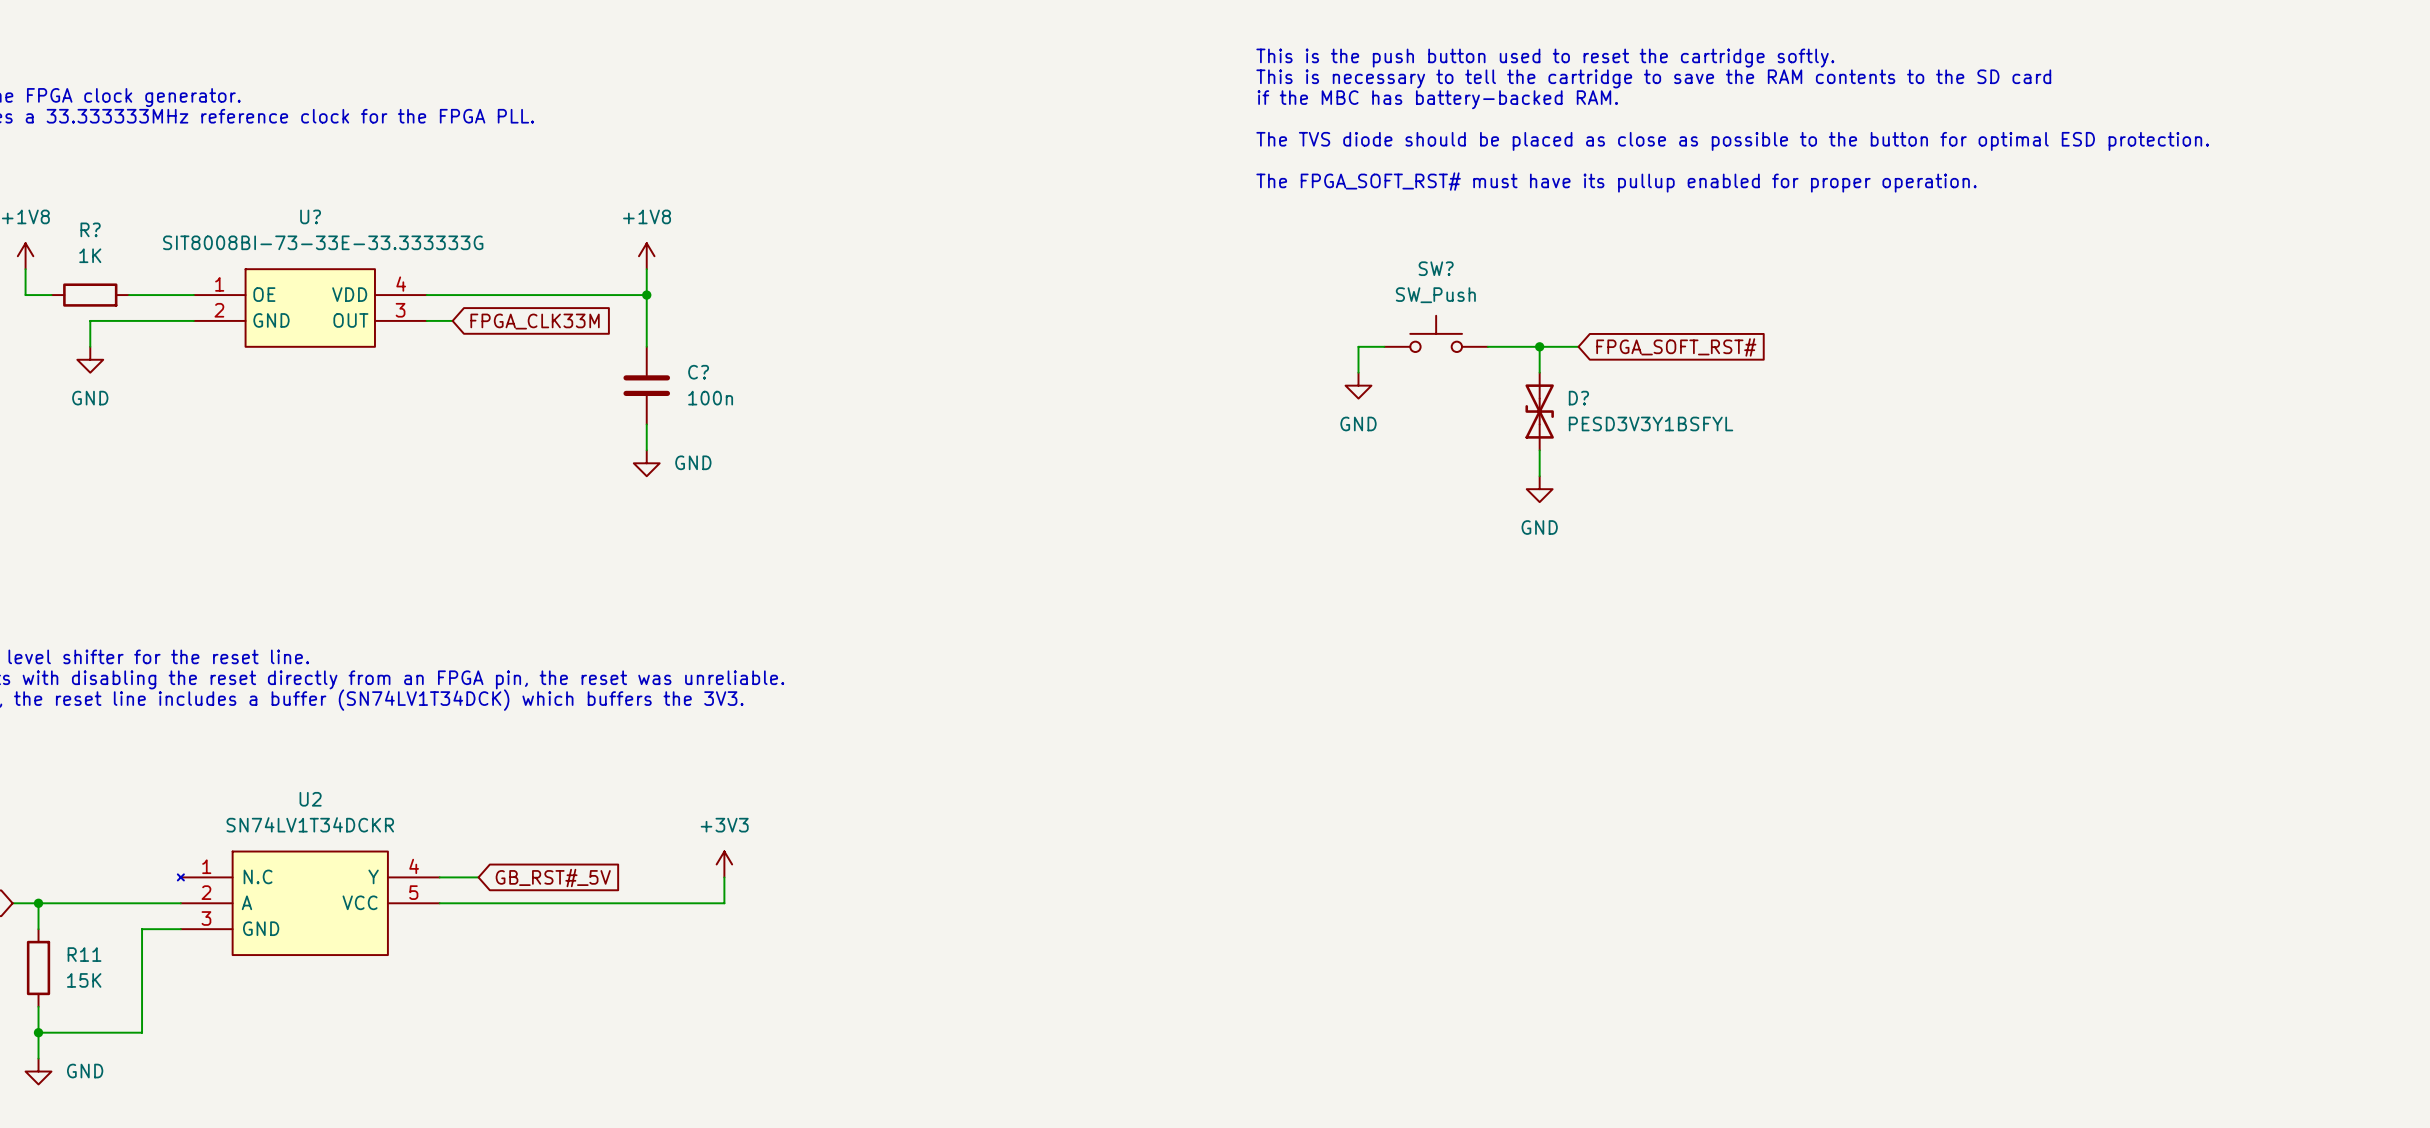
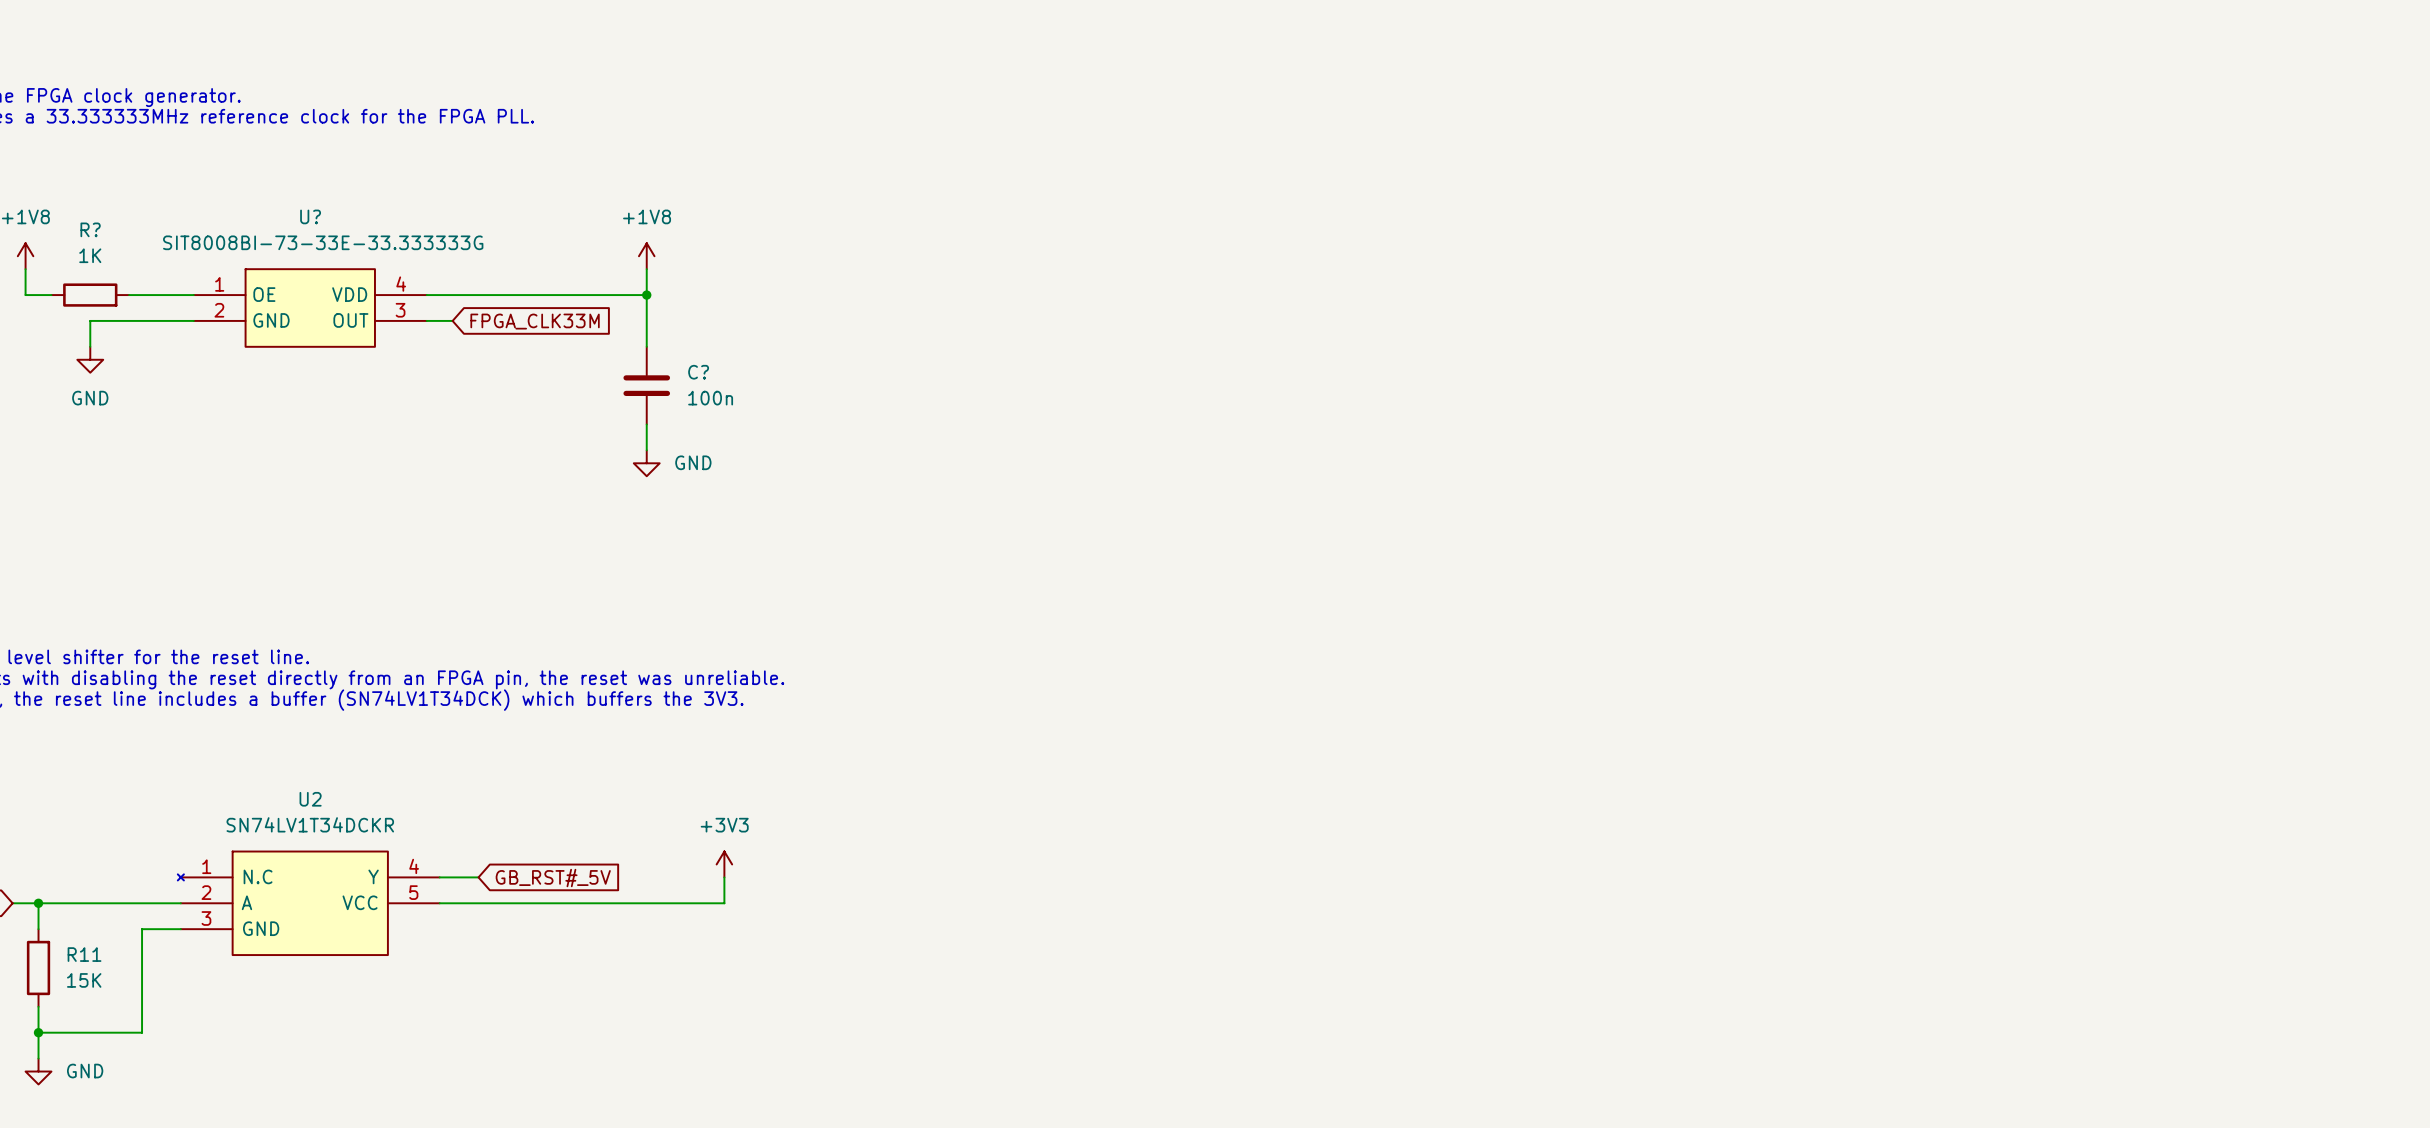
text: This is the push button used to reset the cartridge softly. (1545, 58) -> none
text: This is necessary to tell the cartridge to save the RAM contents to the SD card (1653, 78) -> none
text: if the MBC has battery-backed RAM. (1437, 99) -> none
text: The TVS diode should be placed as close as possible to the button for optimal ESD protection. (1732, 141) -> none
text: The FPGA_SOFT_RST# must have its pullup enabled for proper operation. (1616, 182) -> none
SW?: SW_Push (1436, 333) -> none
wire: (1384, 346) (1358, 346) (1358, 372) -> none
wire: (1487, 346) (1578, 346) -> none
wire: (1539, 346) (1539, 372) -> none
junction: (1539, 346) -> none
global label: FPGA_SOFT_RST# (1676, 347) -> none
power symbol: GND (1358, 385) -> none
D?: PESD3V3Y1BSFYL (1539, 411) -> none
wire: (1539, 450) (1539, 476) -> none
power symbol: GND (1539, 489) -> none

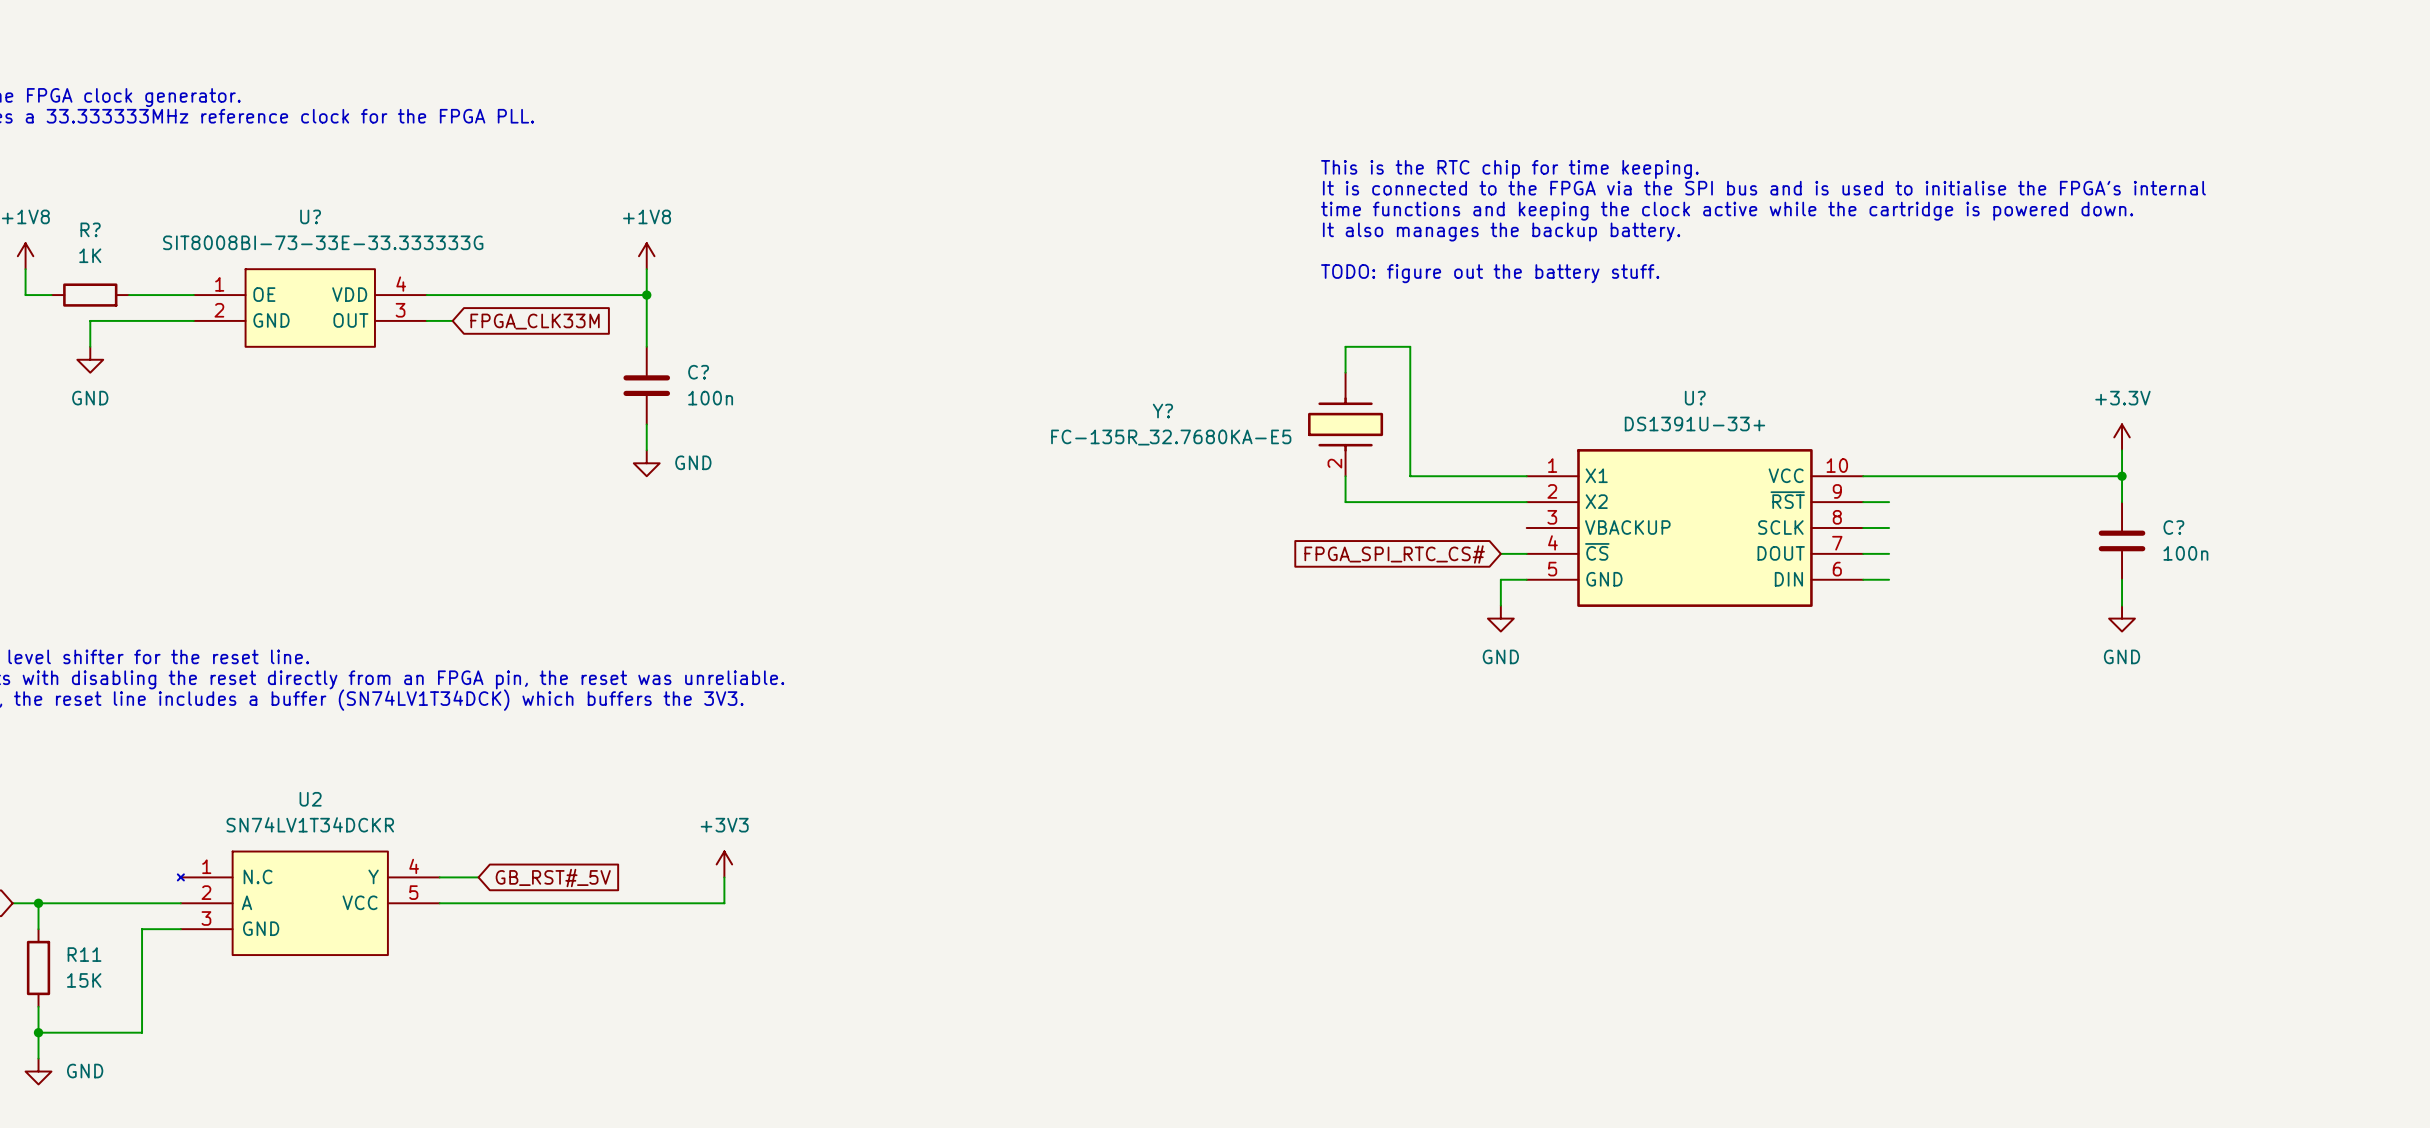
text: none -> This is the RTC chip for time keeping. (1509, 169)
text: none -> It is connected to the FPGA via the SPI bus and is used to initialise the FPGA's internal (1764, 188)
text: none -> time functions and keeping the clock active while the cartridge is powered down. (1727, 211)
text: none -> It also manages the backup battery. (1501, 232)
text: none -> TODO: figure out the battery stuff. (1490, 273)
wire: none -> (1345, 372) (1345, 346) (1410, 346) (1410, 476) (1526, 476)
Y?: none -> FC-135R_32.7680KA-E5 (1345, 424)
power symbol: none -> +3.3V (2122, 437)
wire: none -> (2122, 450) (2122, 502)
wire: none -> (1345, 476) (1345, 502) (1526, 502)
wire: none -> (1863, 476) (2122, 476)
junction: none -> (2122, 476)
wire: none -> (1863, 502) (1889, 502)
U?: none -> DS1391U-33+ (1694, 528)
wire: none -> (1863, 528) (1889, 528)
C?: none -> 100n (2122, 540)
wire: none -> (1500, 553) (1526, 553)
wire: none -> (1863, 553) (1889, 553)
global label: none -> FPGA_SPI_RTC_CS# (1394, 554)
wire: none -> (1526, 579) (1500, 579) (1500, 605)
wire: none -> (1863, 579) (1889, 579)
wire: none -> (2122, 579) (2122, 605)
power symbol: none -> GND (1500, 618)
power symbol: none -> GND (2122, 618)

